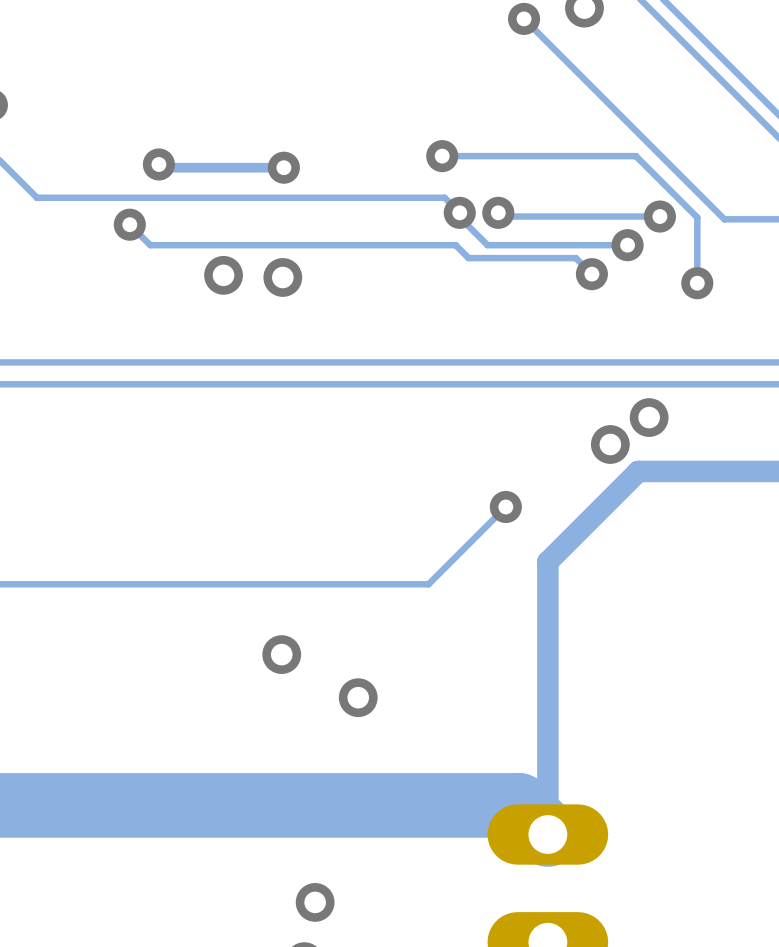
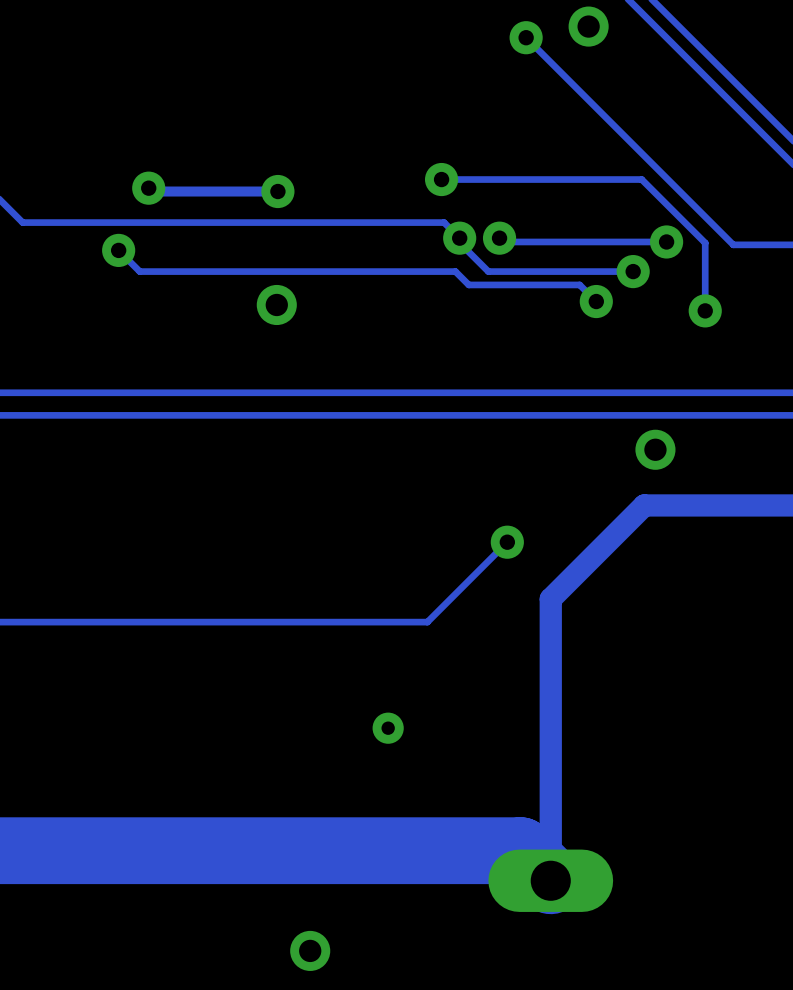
via: (223, 275) -> none
via: (610, 444) -> none
via: (281, 654) -> none
via position: (358, 697) -> (388, 728)

